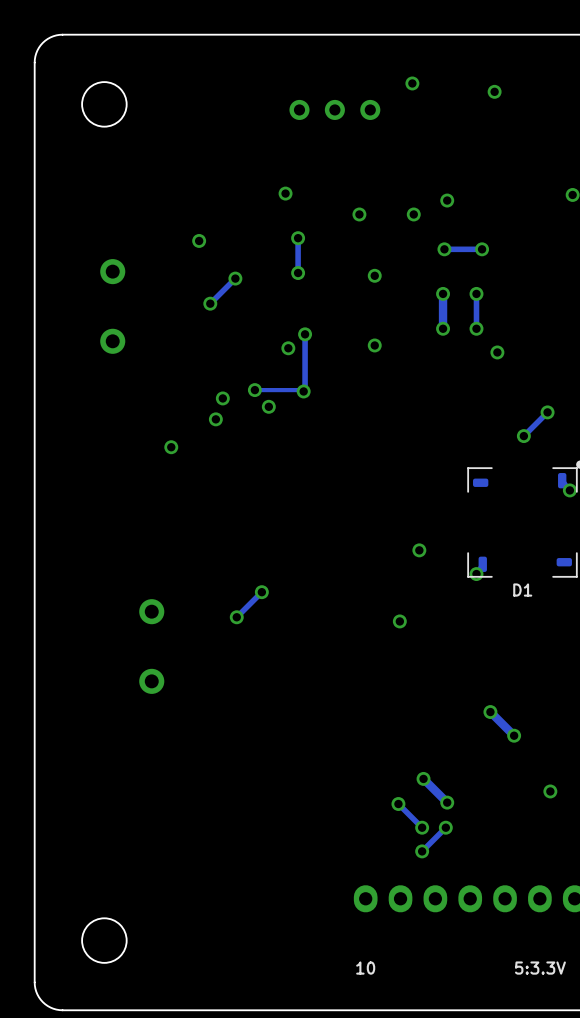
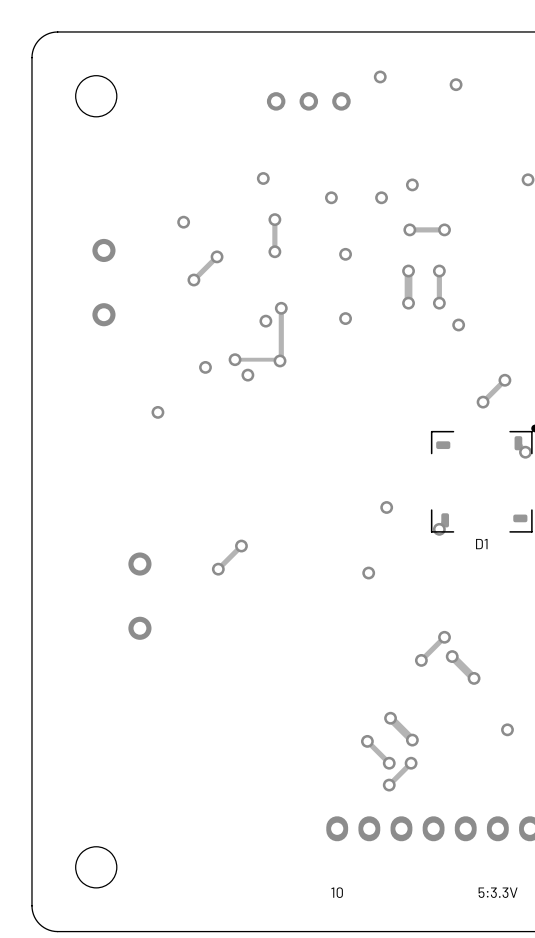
via: (215, 419) -> none
track: none -> (444, 637) (421, 660)
via: none -> (444, 637)
via: none -> (421, 660)

